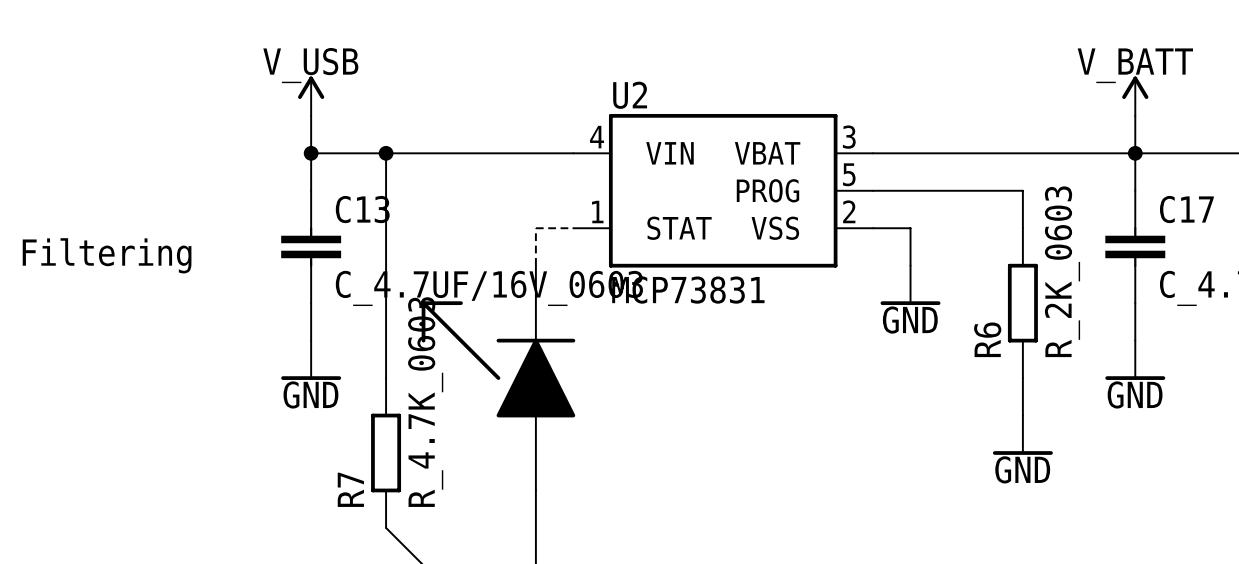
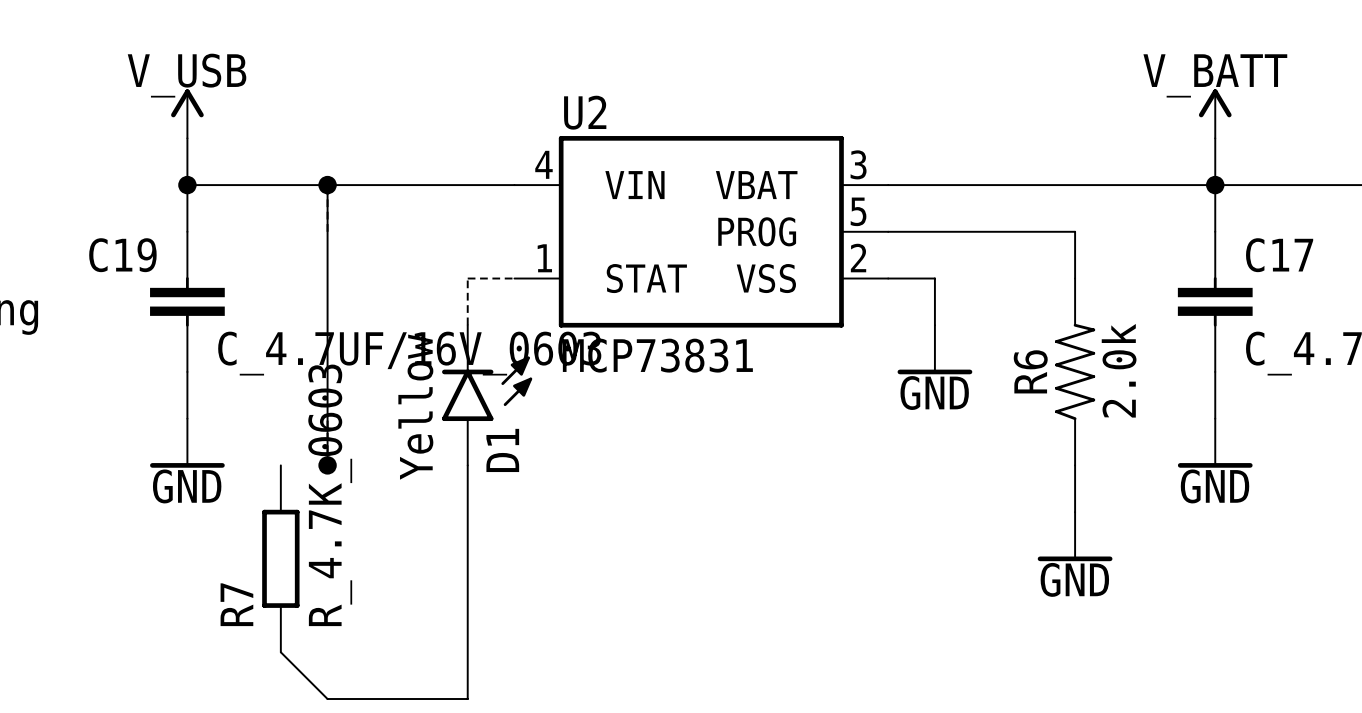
wire: (386, 153) (386, 378) -> none
junction position: (386, 153) -> (327, 185)
wire: none -> (327, 231) (327, 185) (327, 465) (327, 418)
C13 name: C13 (362, 209) -> C19 (122, 255)
R6 symbol: [1007, 228, 1038, 379] -> [1055, 278, 1096, 466]
R6 value: R_2K_0603 (1062, 271) -> 2.0k (1119, 370)
D1: none -> Yellow (487, 395)
R6 name position: R6 (987, 339) -> R6 (1030, 371)
junction: none -> (327, 465)
part: (498, 378) -> none

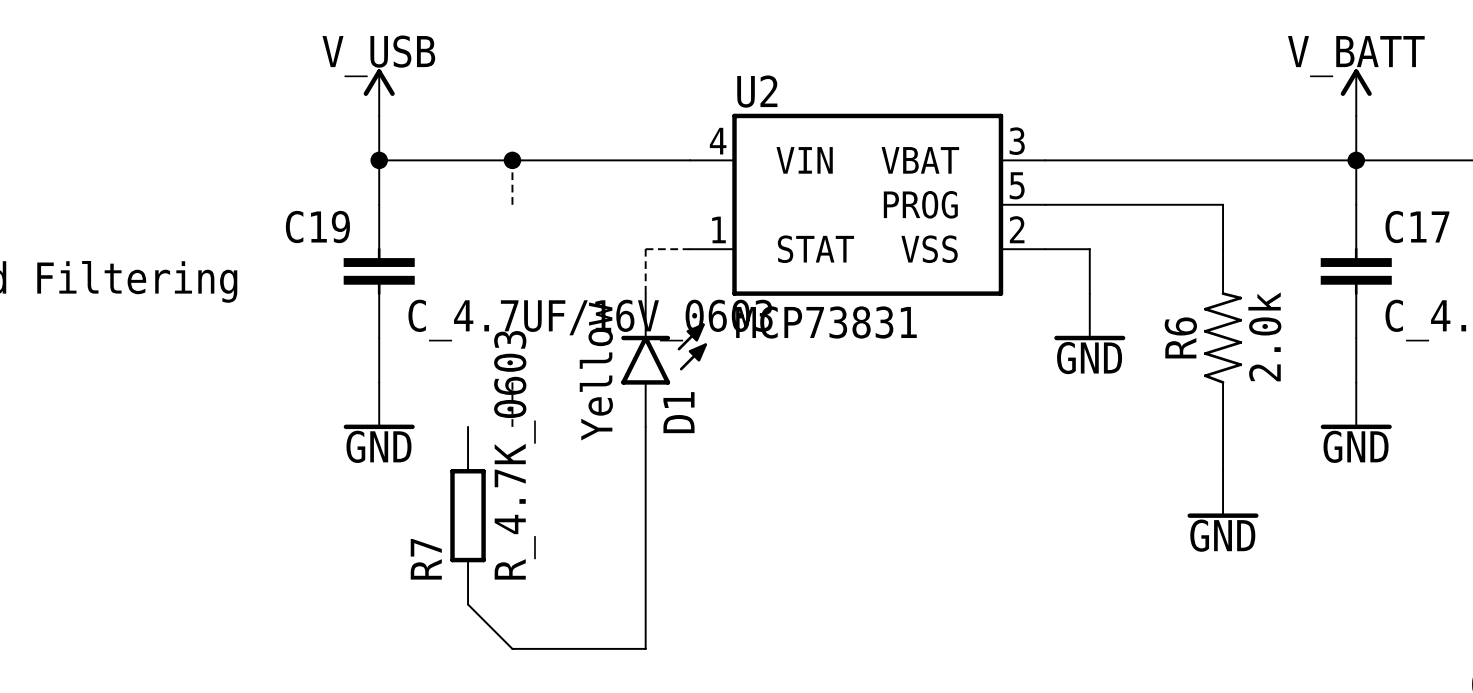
wire: (327, 185) (327, 465) -> none
junction: (327, 465) -> none

